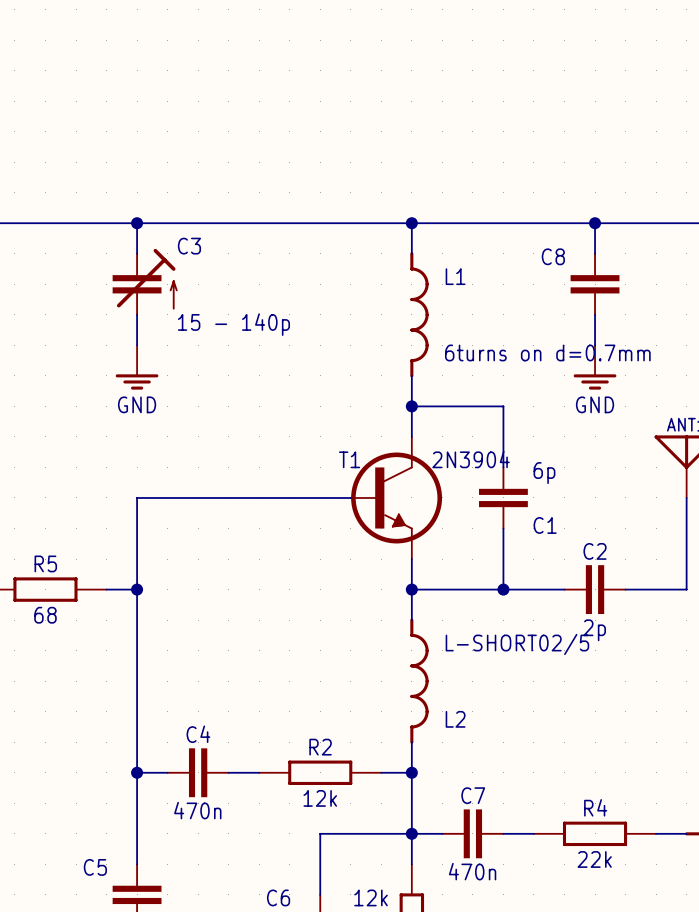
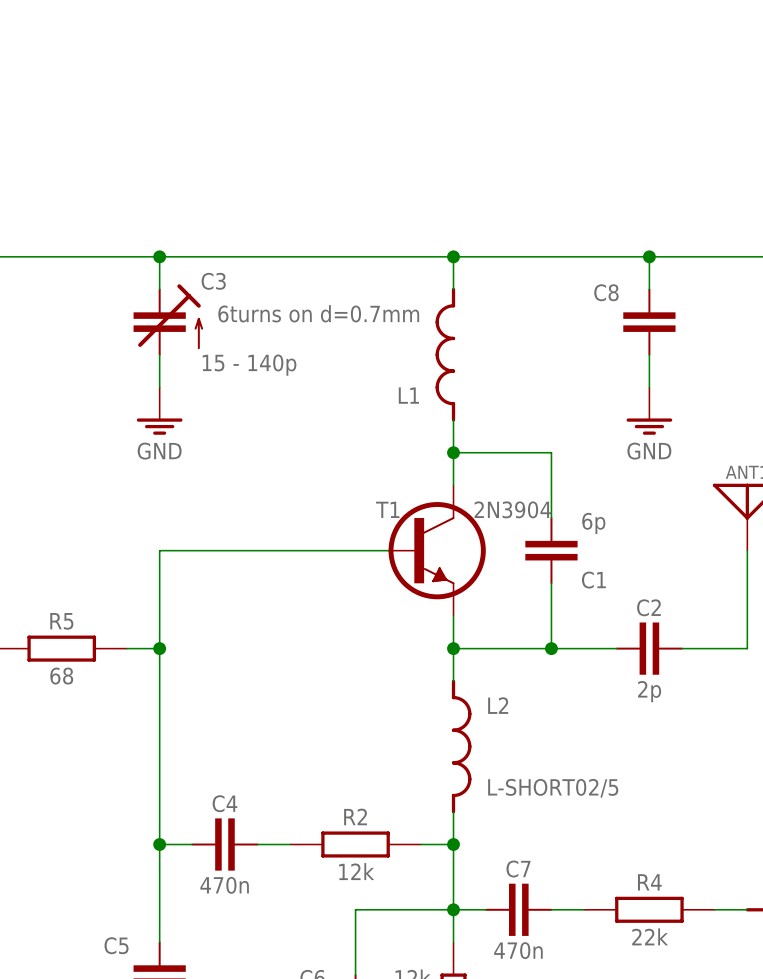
L1 rotation: 0° (419, 314) -> 180° (445, 354)
L2 value position: L-SHORT02/5 (517, 644) -> L-SHORT02/5 (553, 788)
L2 name position: L2 (455, 719) -> L2 (498, 705)

